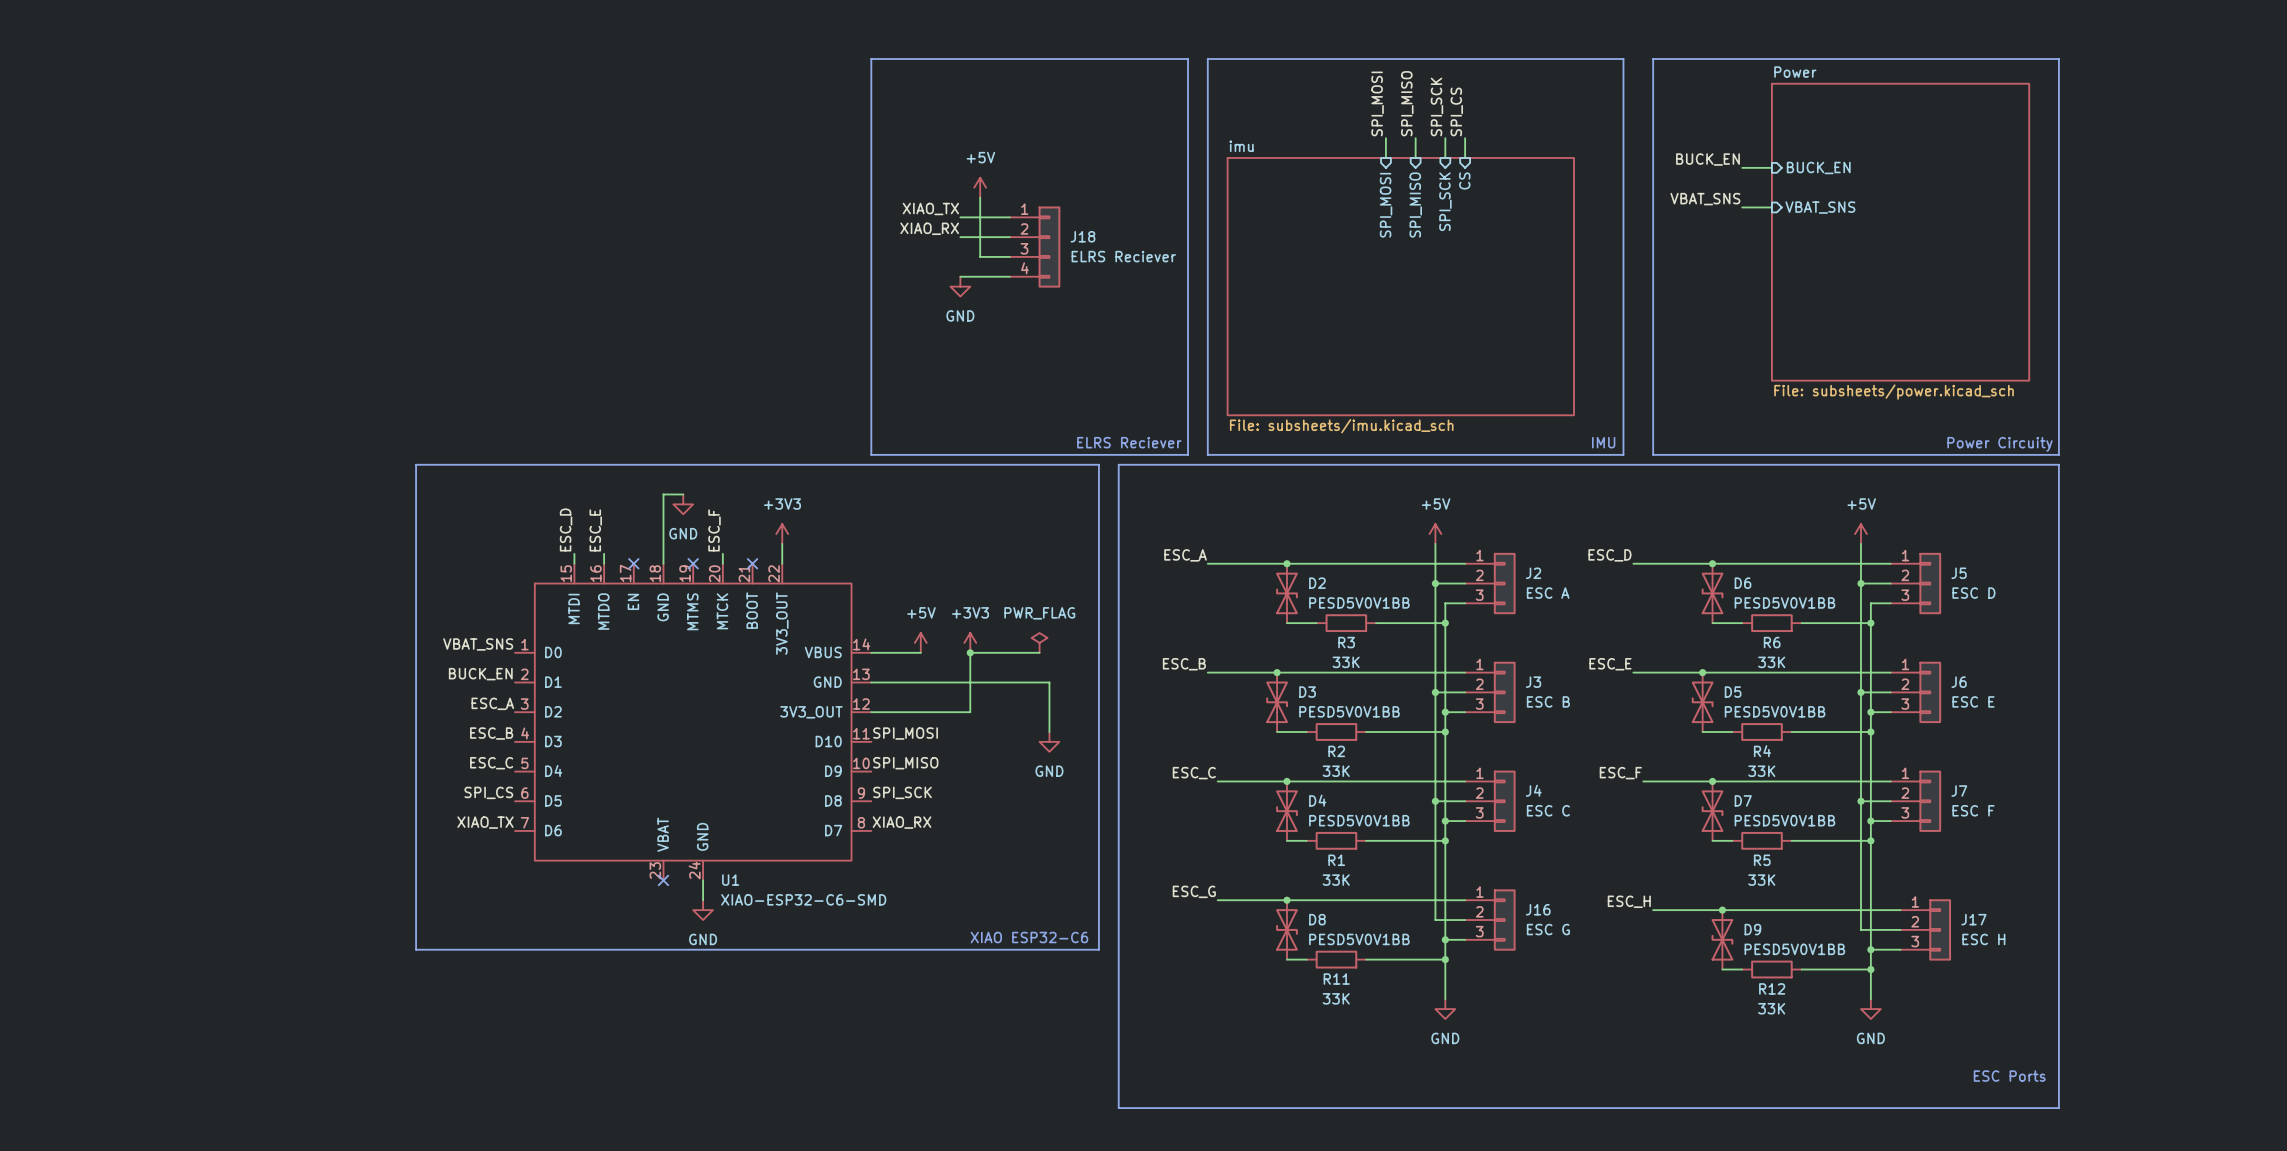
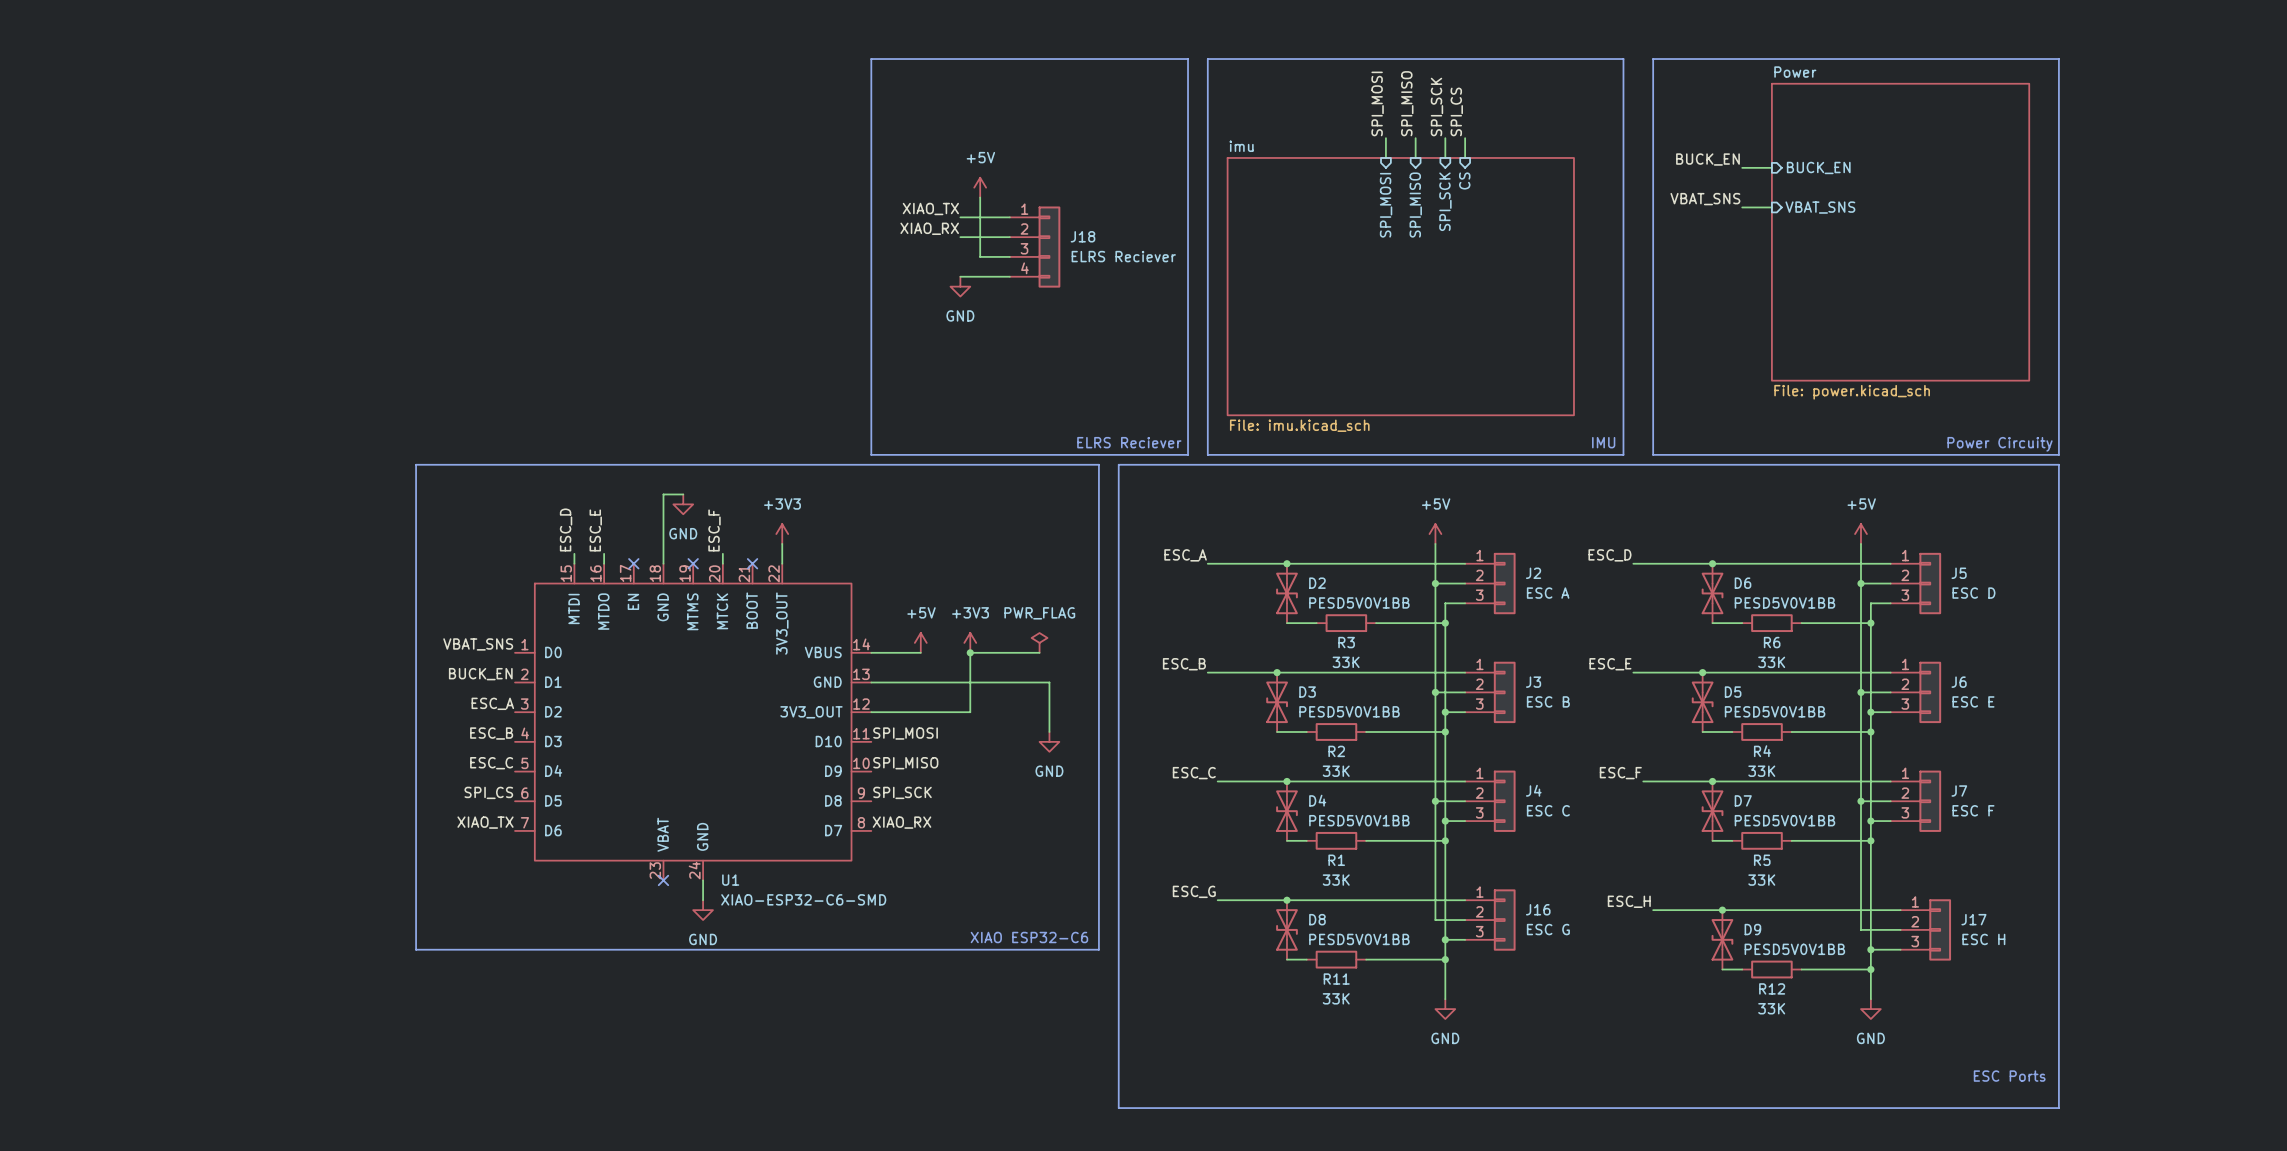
sheet Power value: File: subsheets/power.kicad_sch (1894, 392) -> File: power.kicad_sch (1852, 392)
sheet imu value: File: subsheets/imu.kicad_sch (1341, 426) -> File: imu.kicad_sch (1299, 425)

